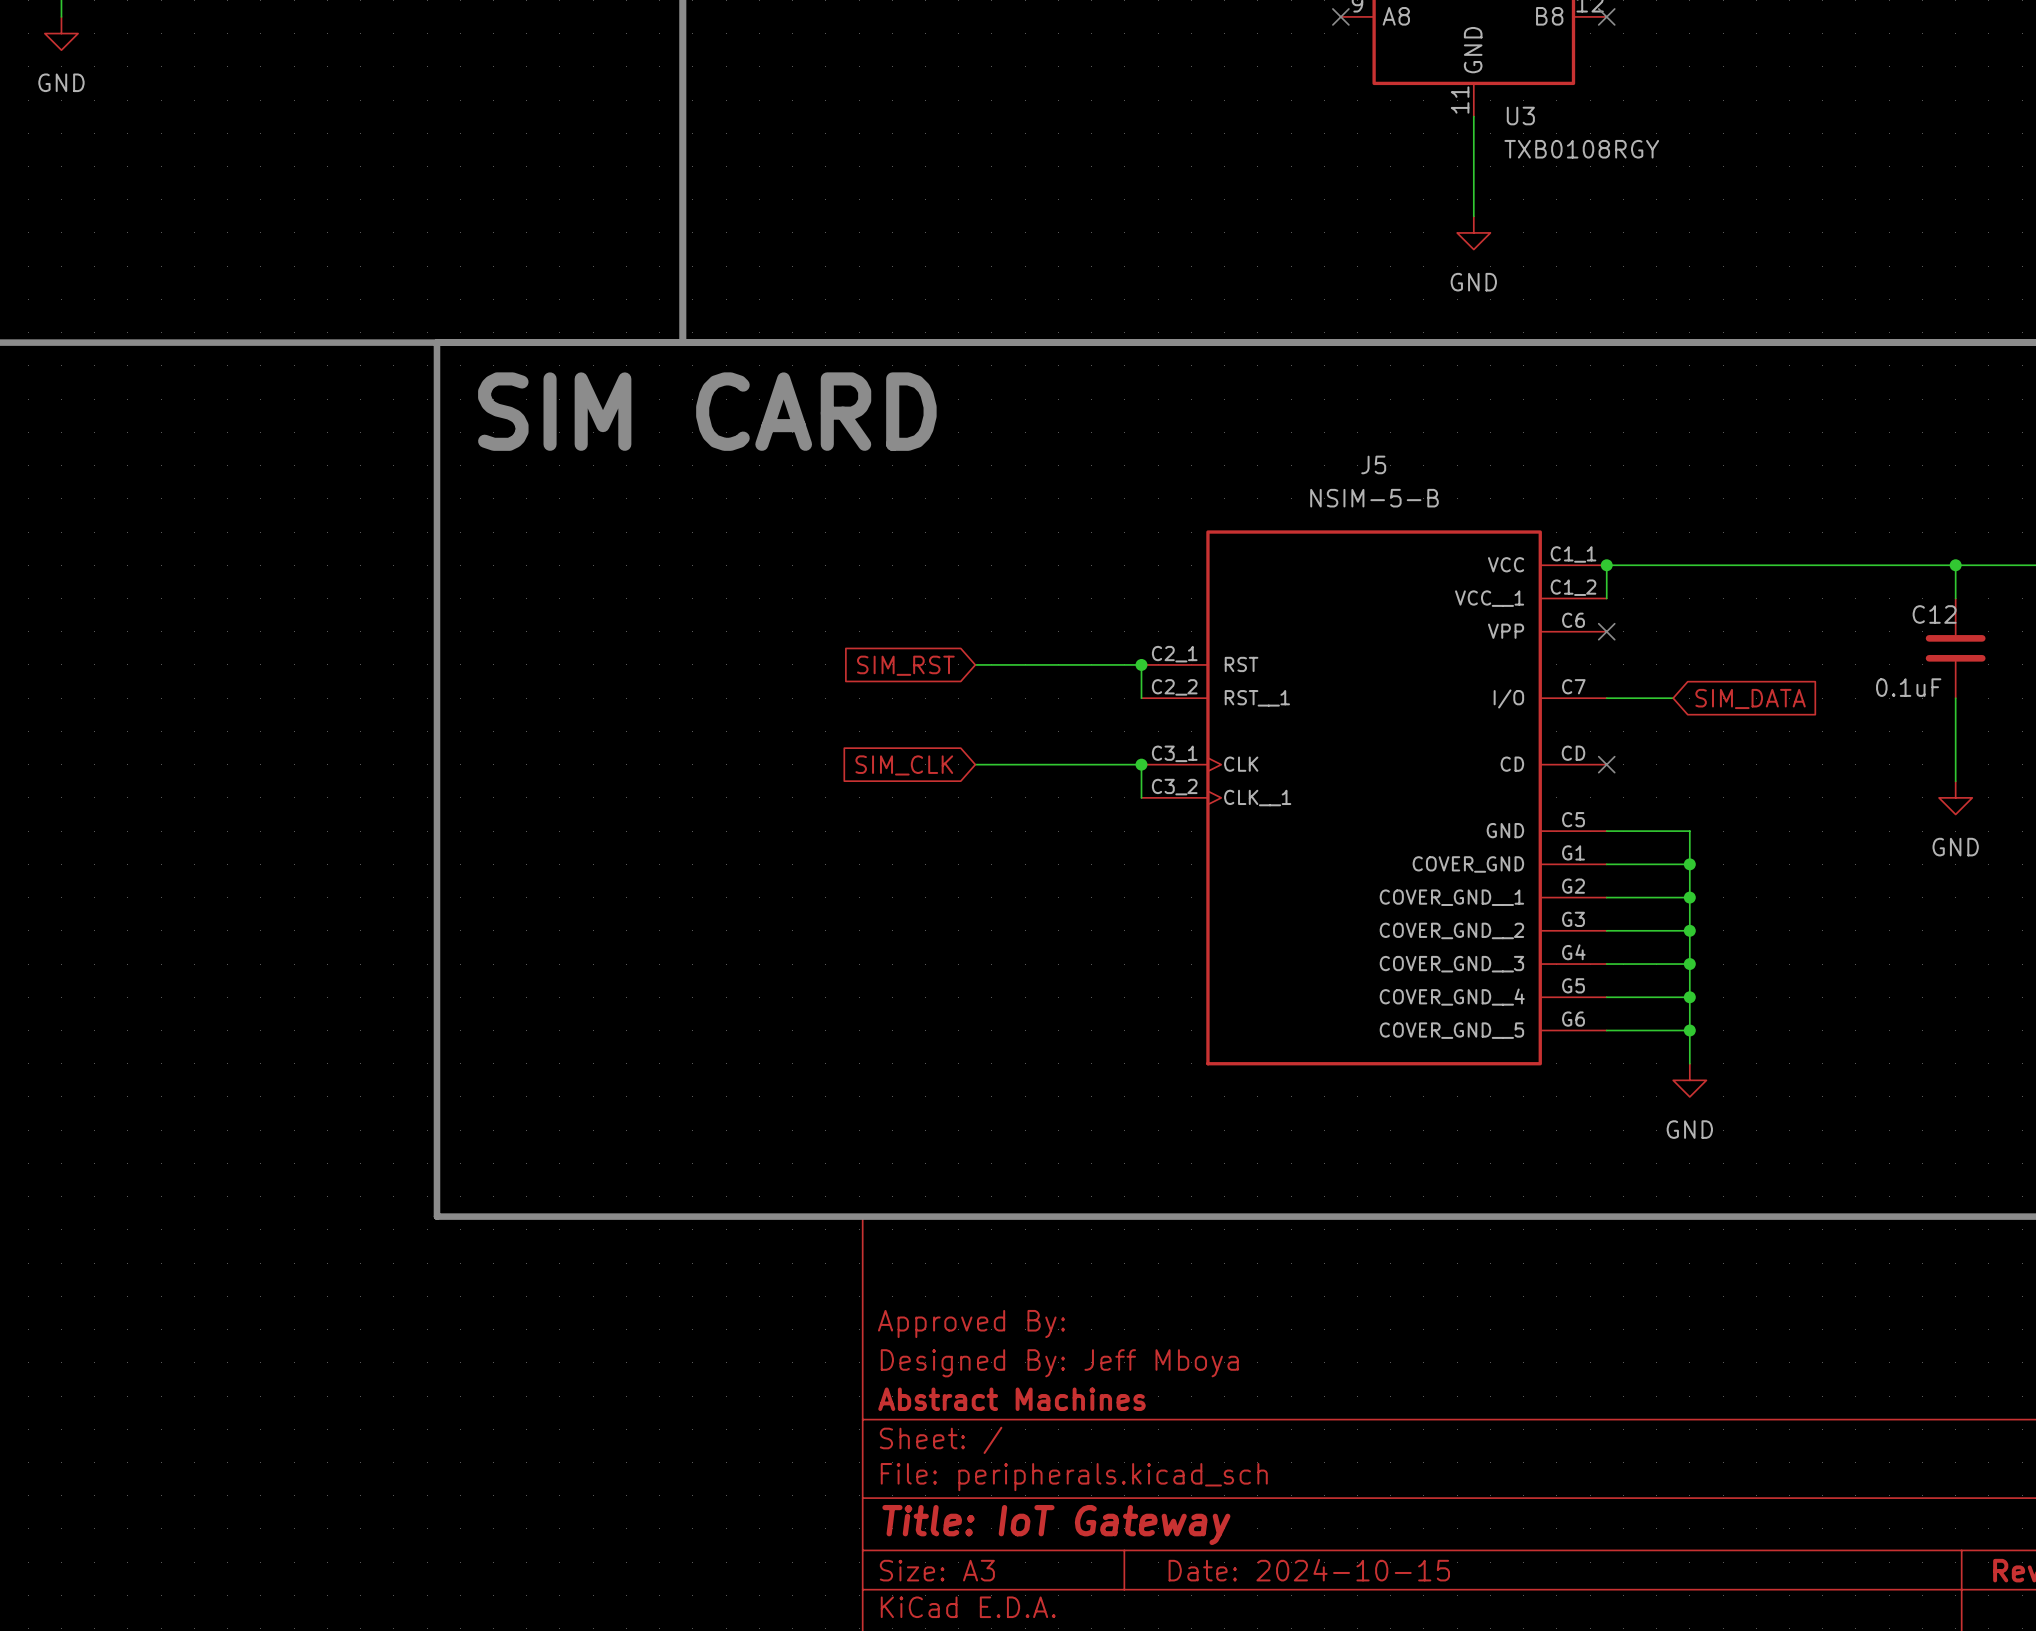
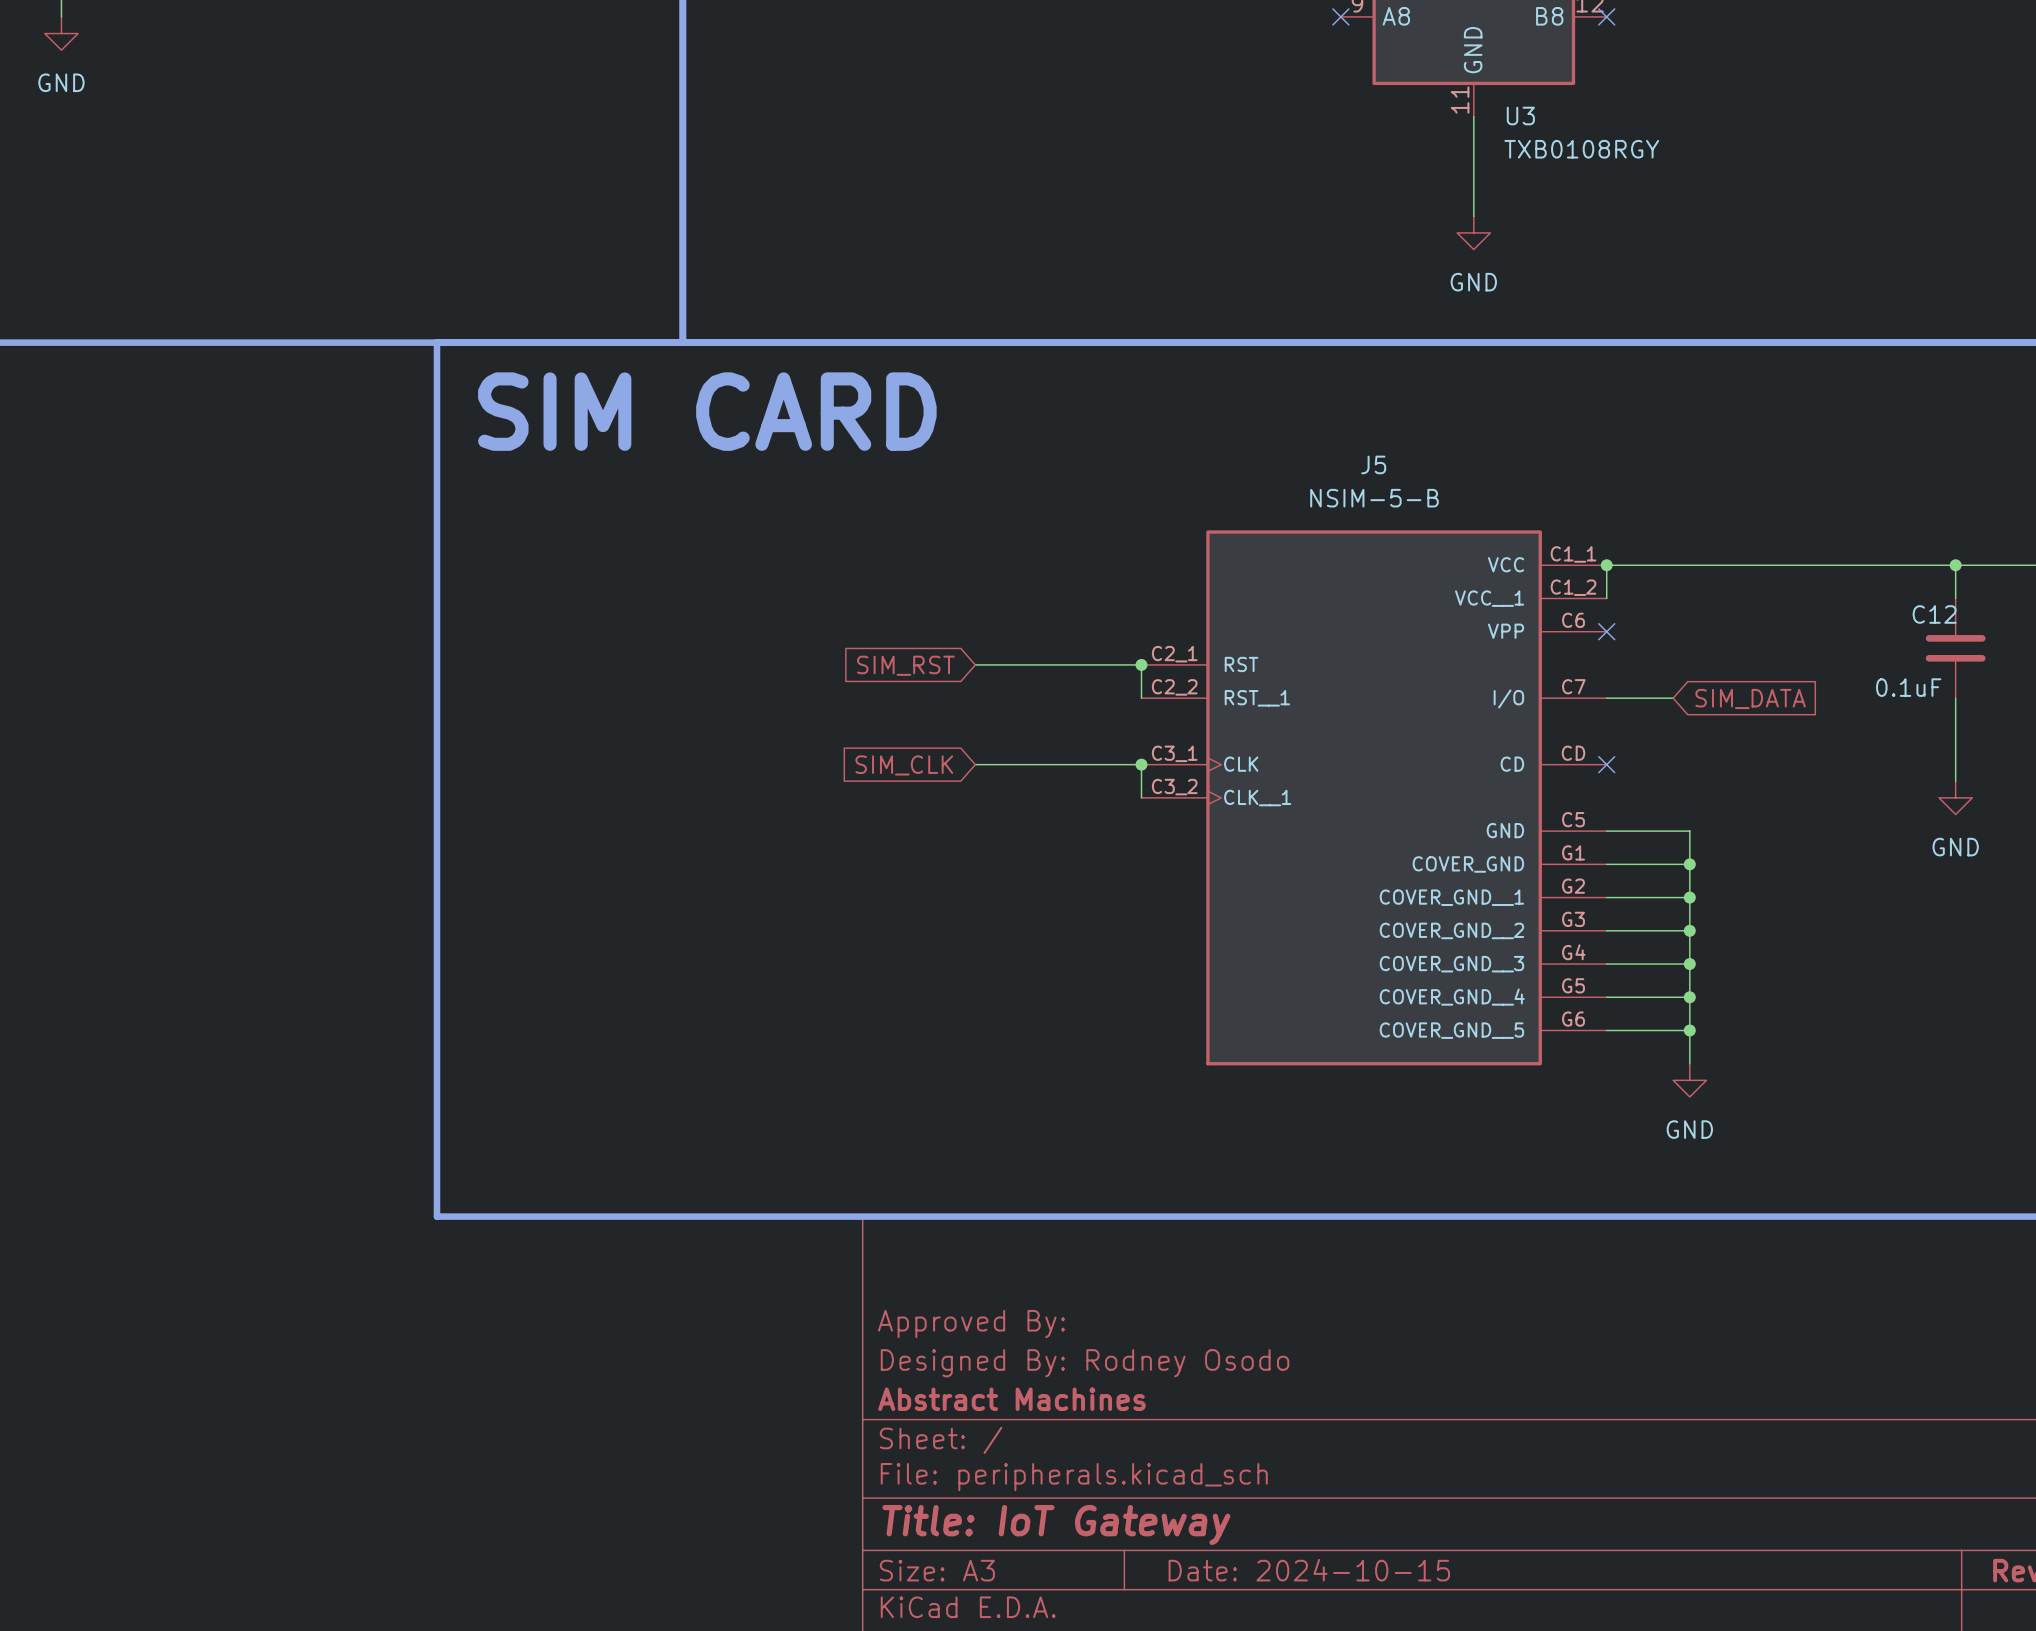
title block: Designed By: Jeff Mboya (1059, 1363) -> Designed By: Rodney Osodo (1085, 1363)

